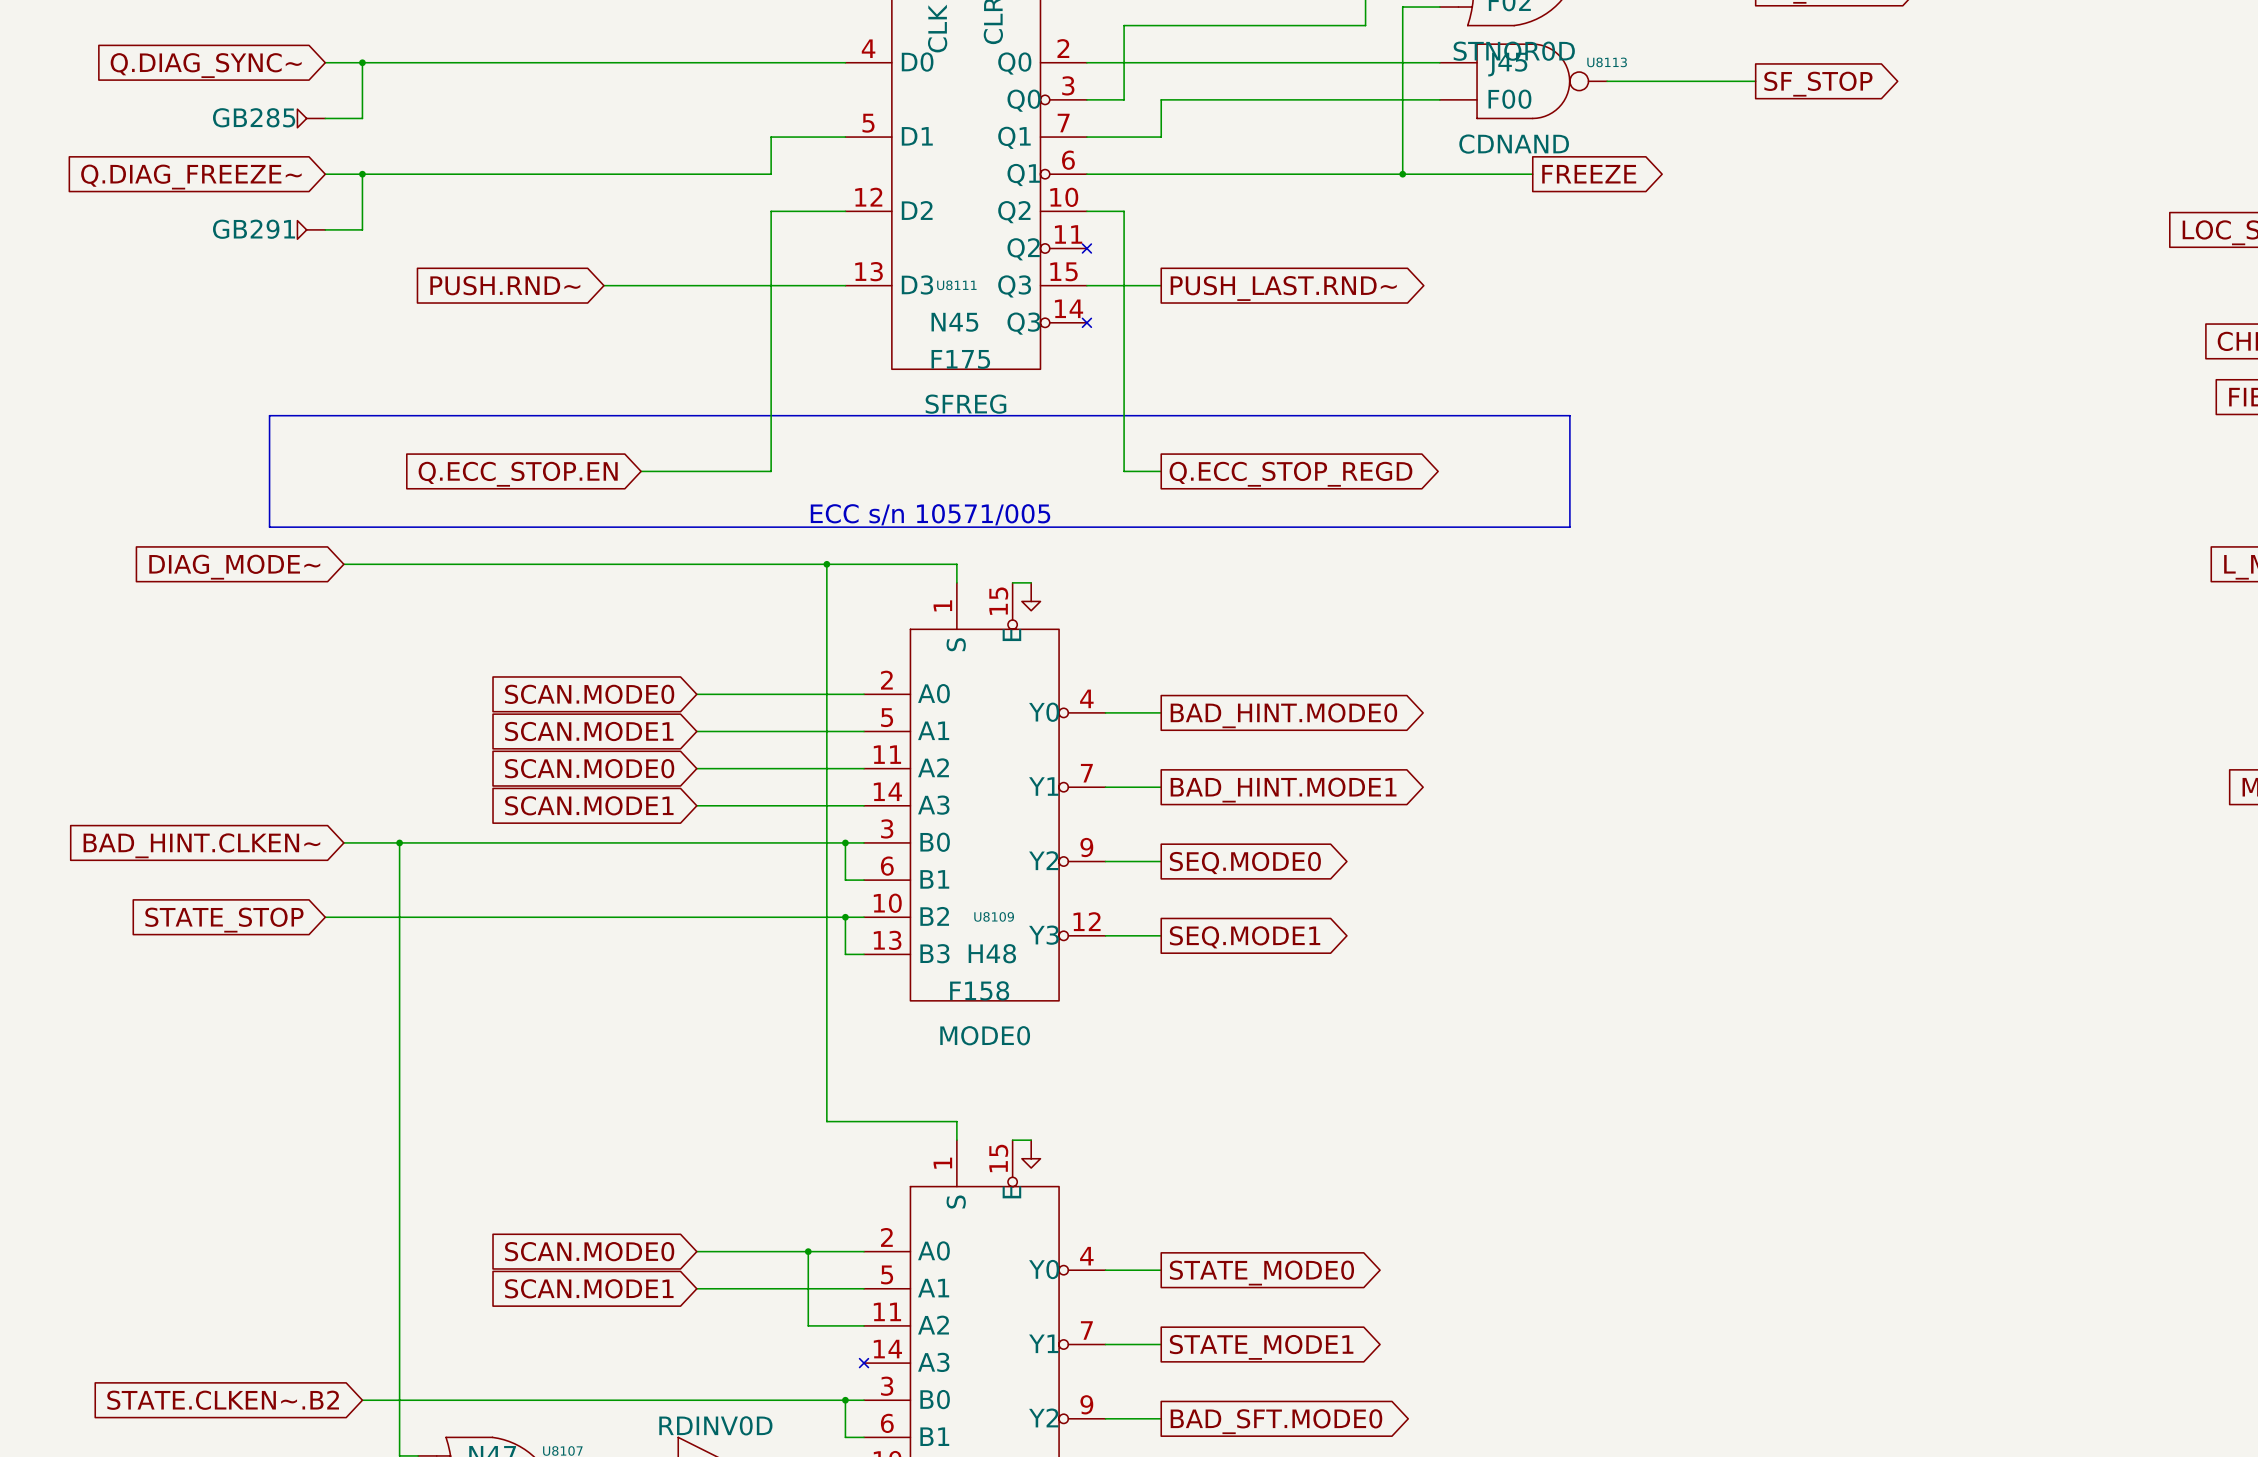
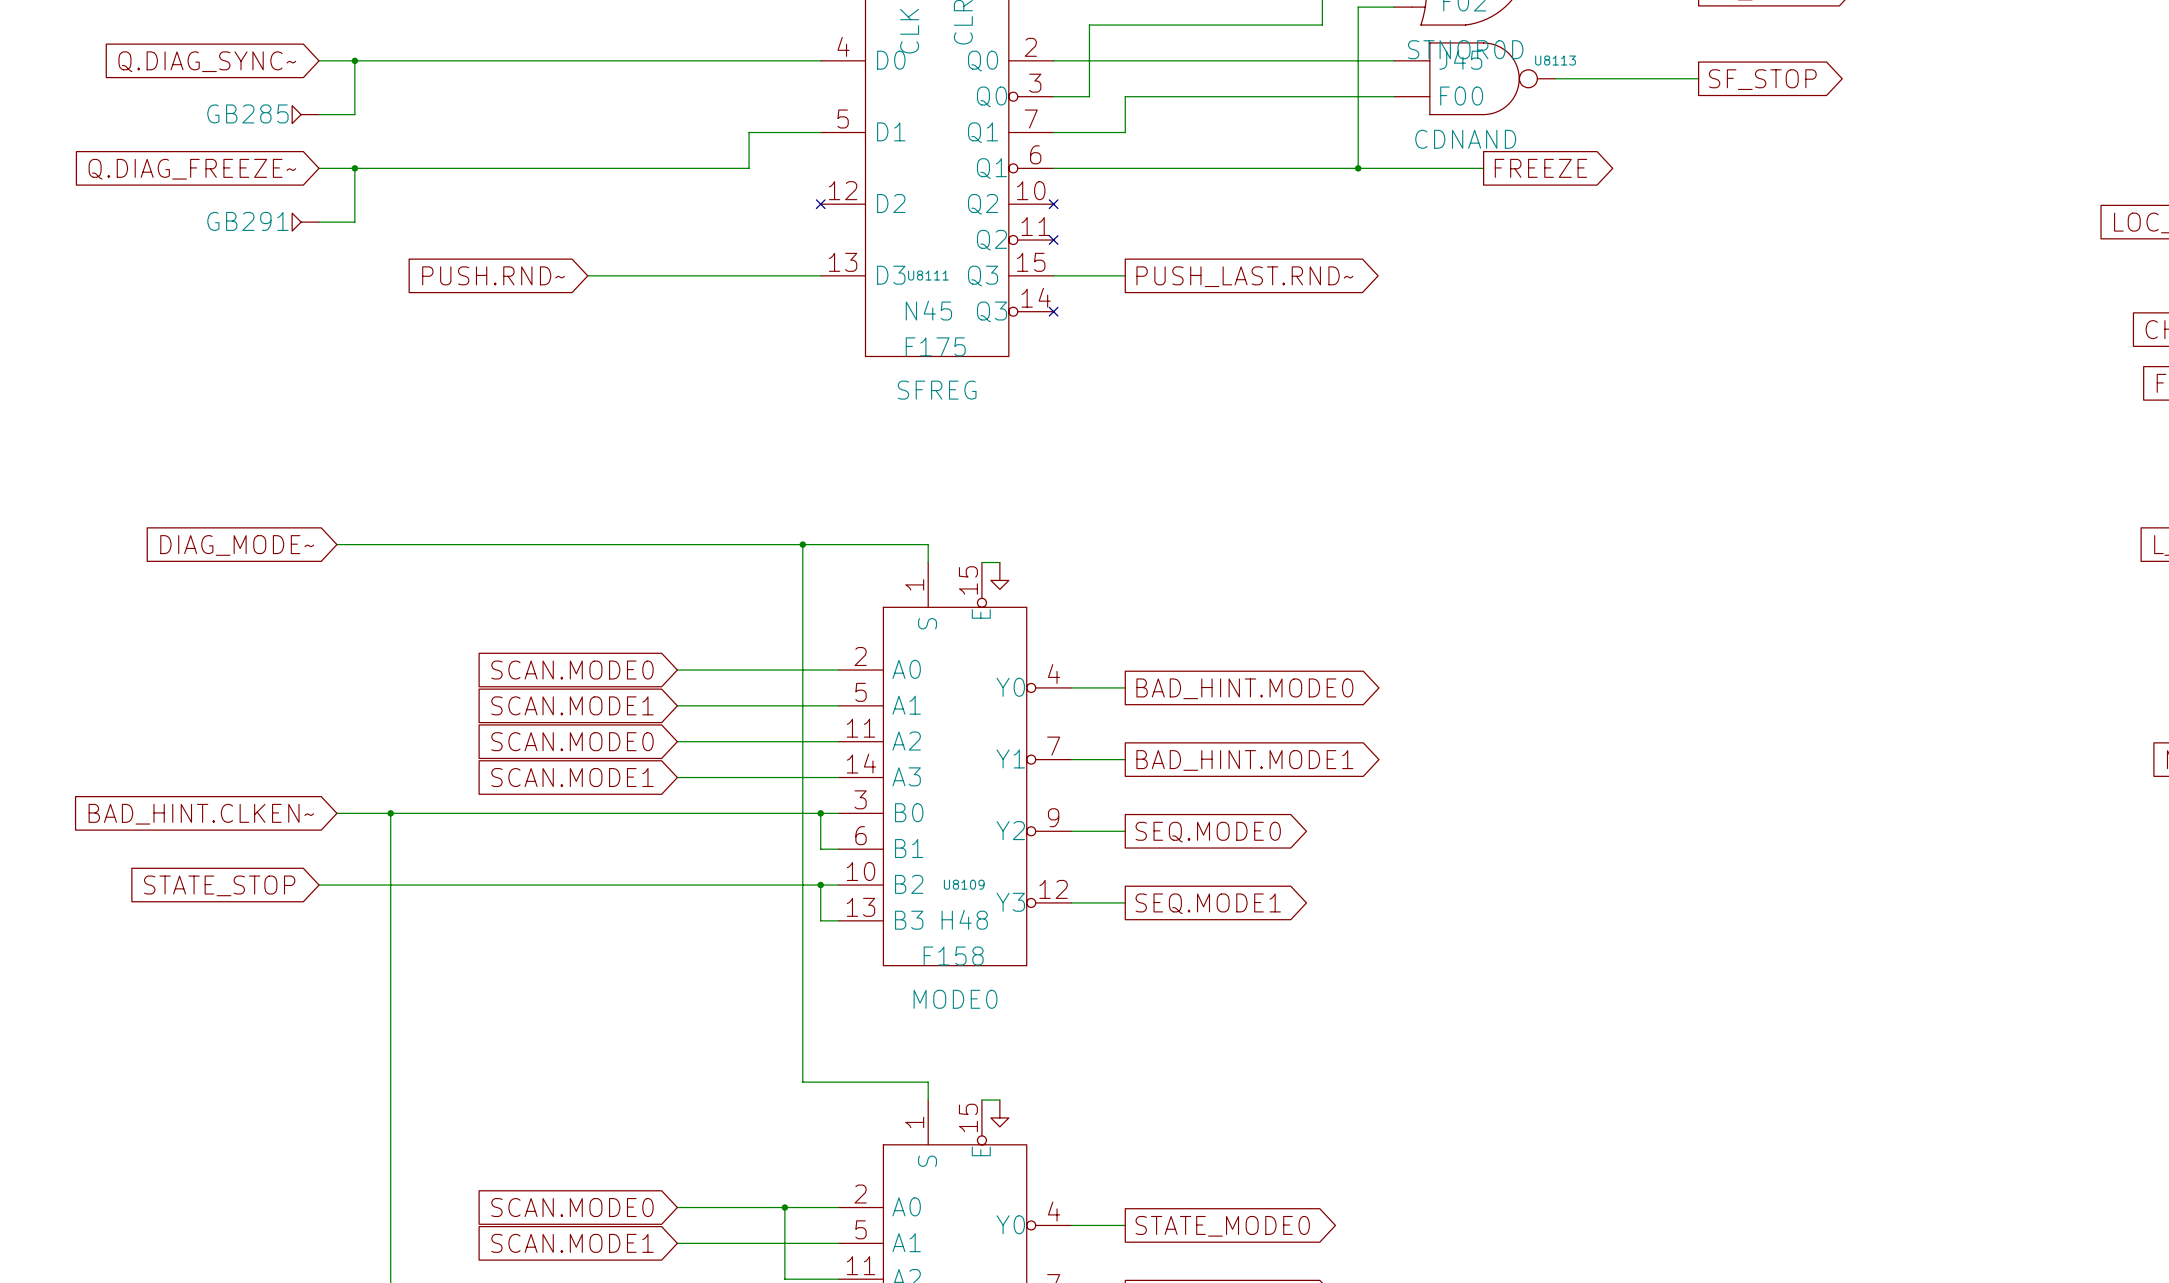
wire: (845, 211) (771, 211) (771, 471) (641, 471) -> none
no-connect mark: none -> (820, 204)
wire: (1086, 211) (1124, 211) (1124, 471) (1161, 471) -> none
no-connect mark: none -> (1053, 204)
line: (269, 415) (1569, 415) (1569, 527) (269, 527) (269, 415) -> none
global label: Q.ECC_STOP.EN (518, 474) -> none
global label: Q.ECC_STOP_REGD (1290, 474) -> none
text: ECC s/n 10571/005 (930, 514) -> none

